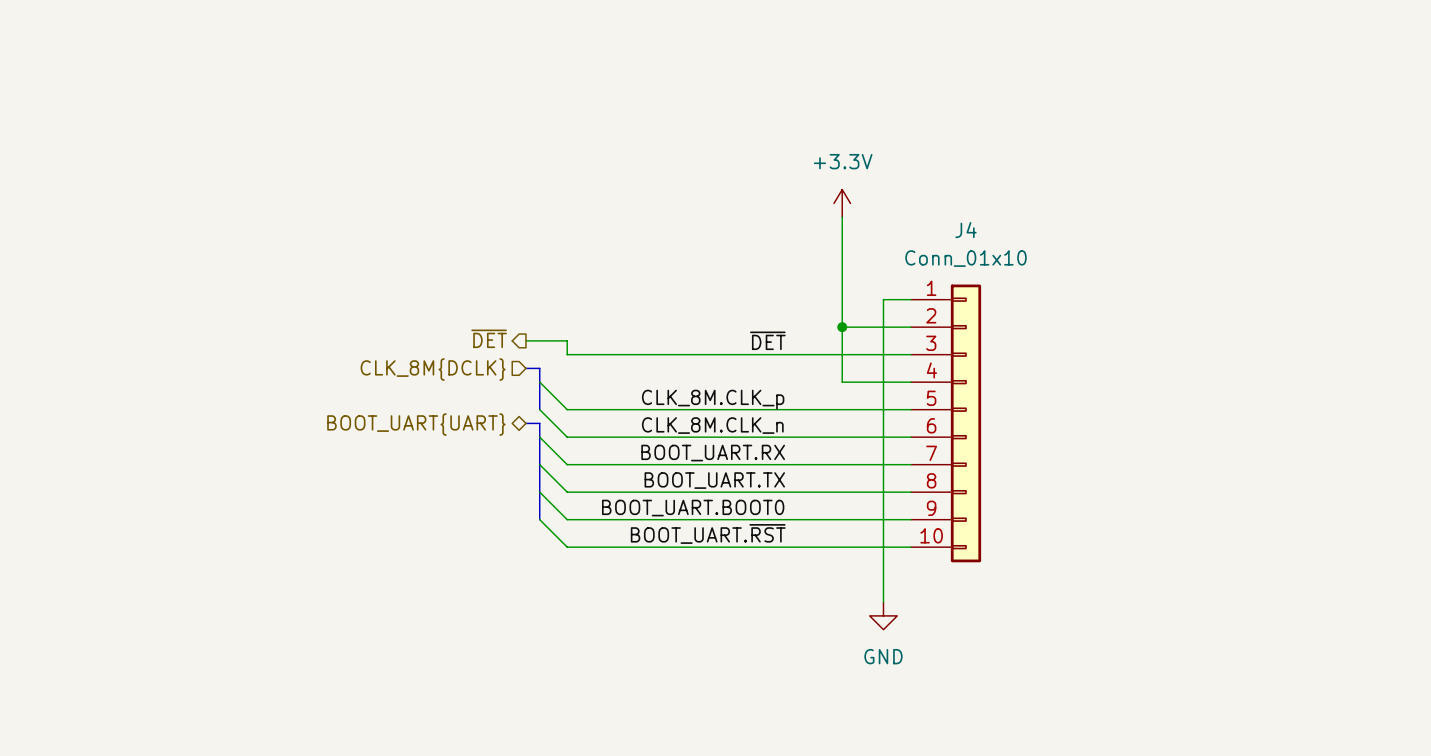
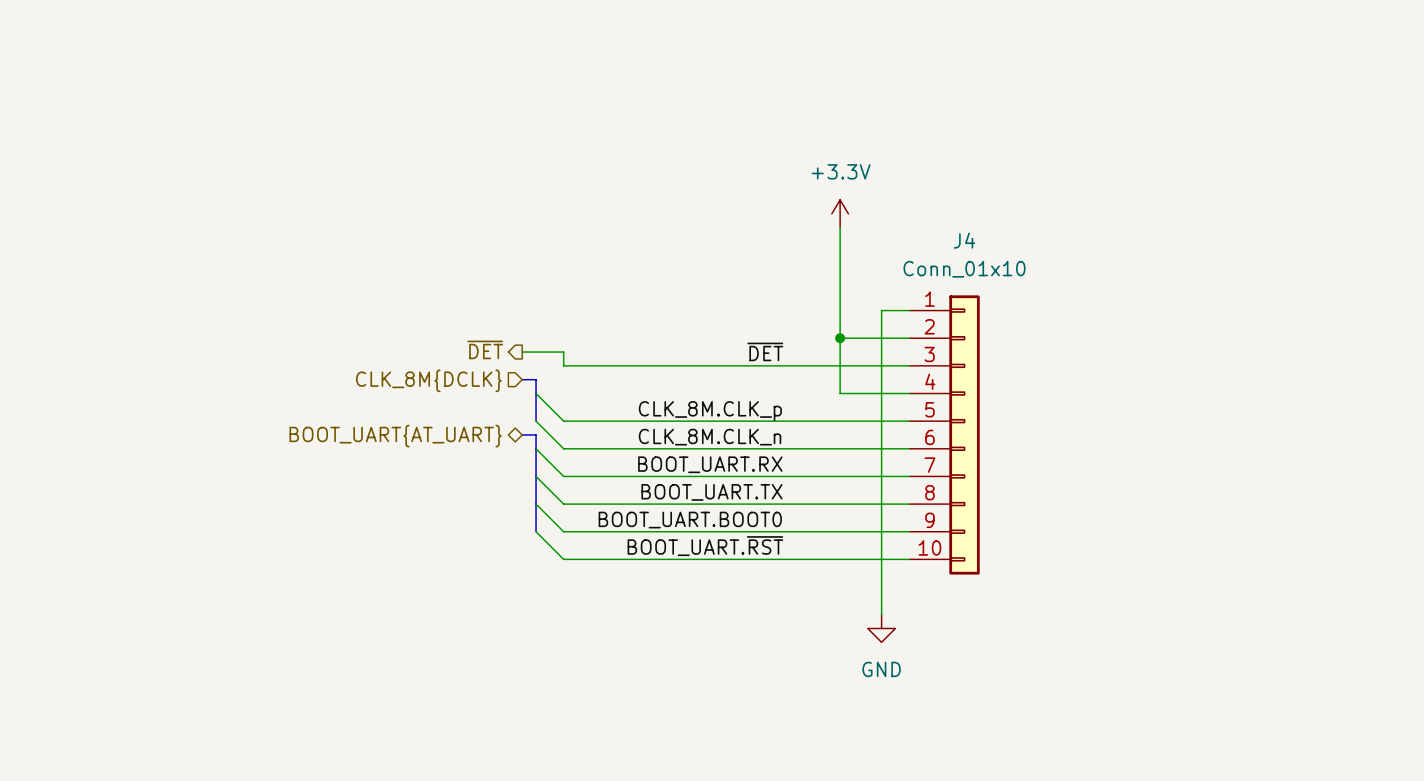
hierarchical label: BOOT_UART{UART} (416, 424) -> BOOT_UART{AT_UART} (395, 436)

